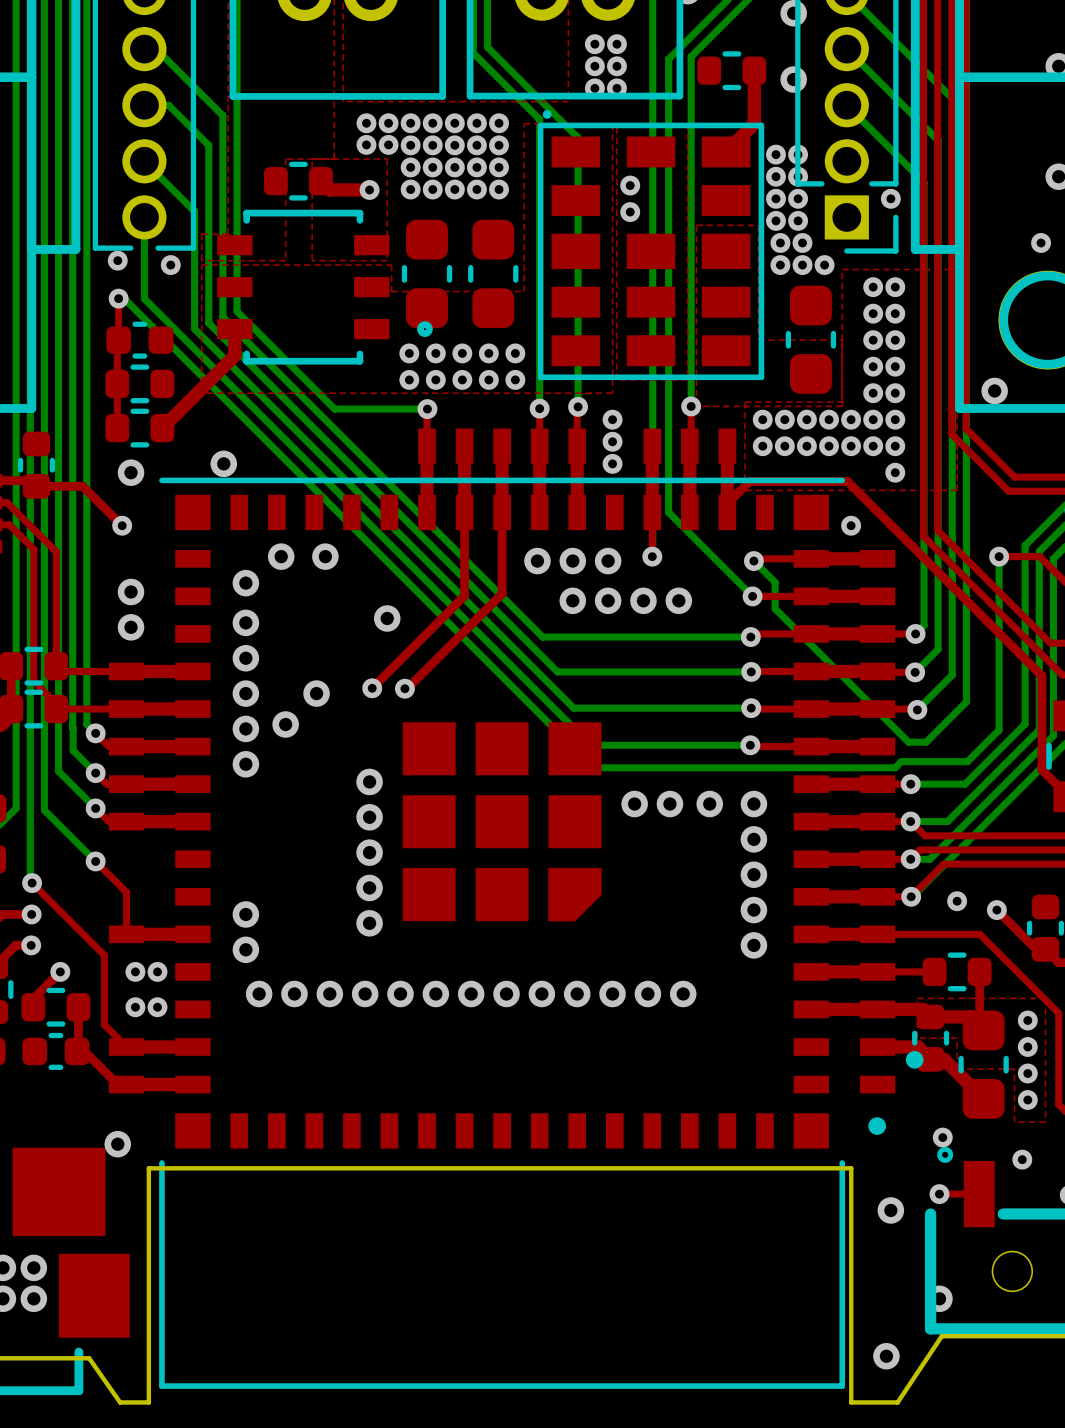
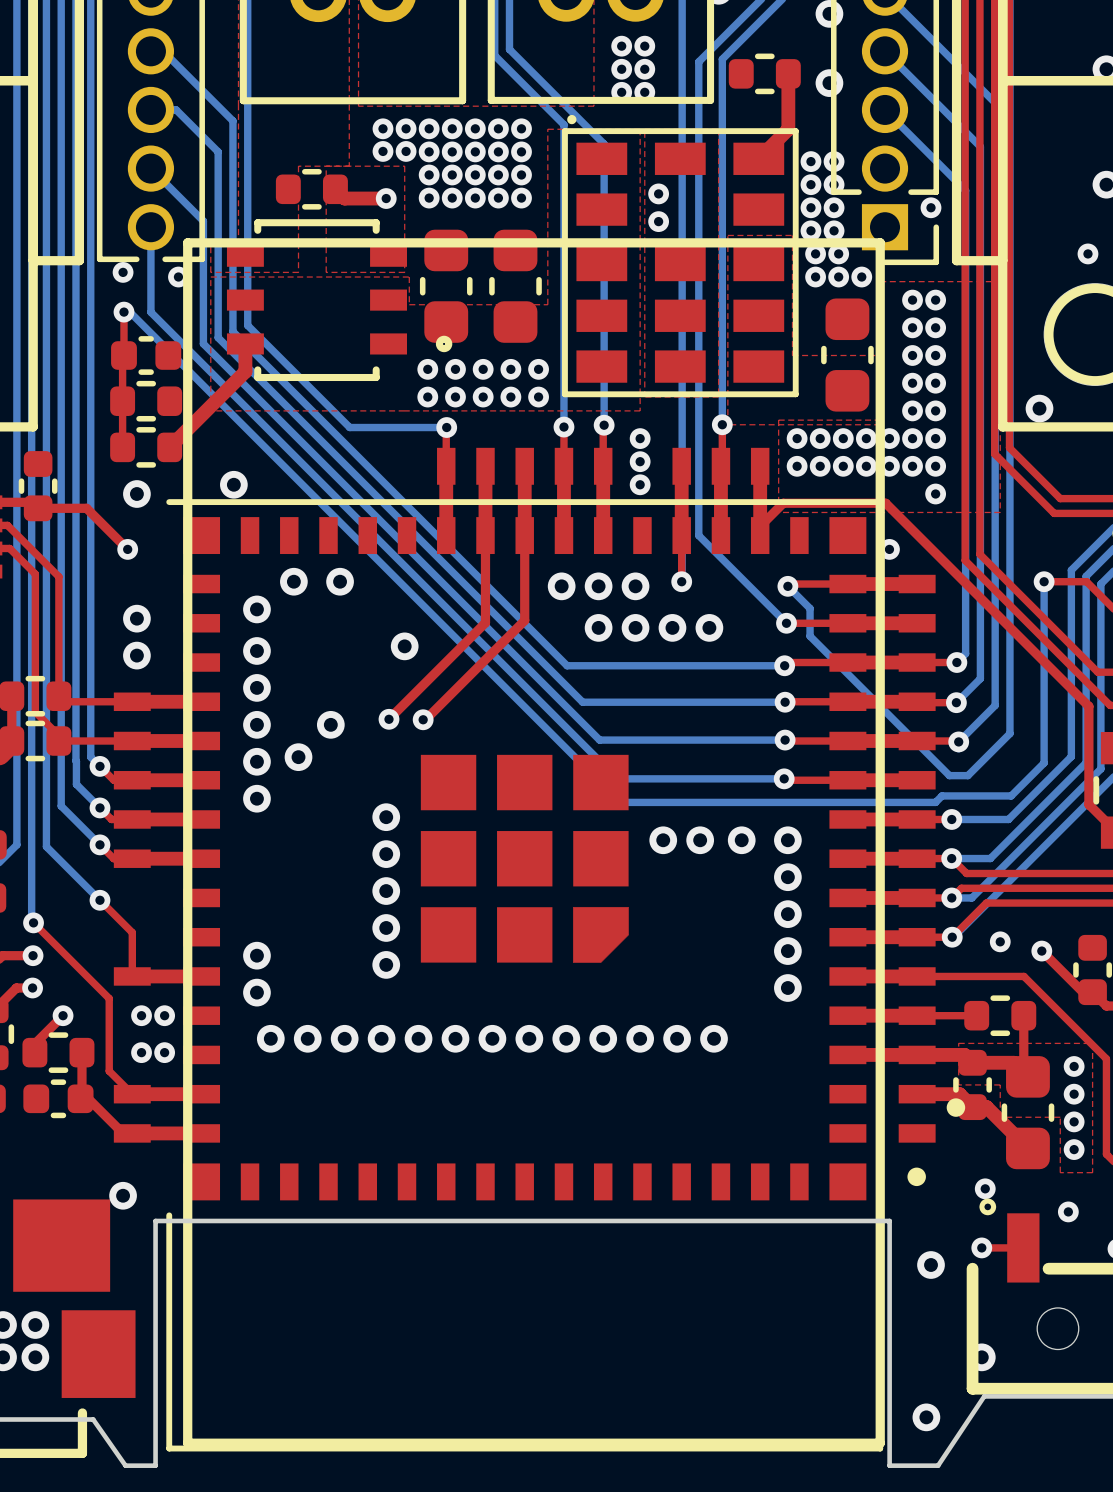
line: none -> (187, 242) (880, 242) (880, 1443) (187, 1443) (187, 242)

